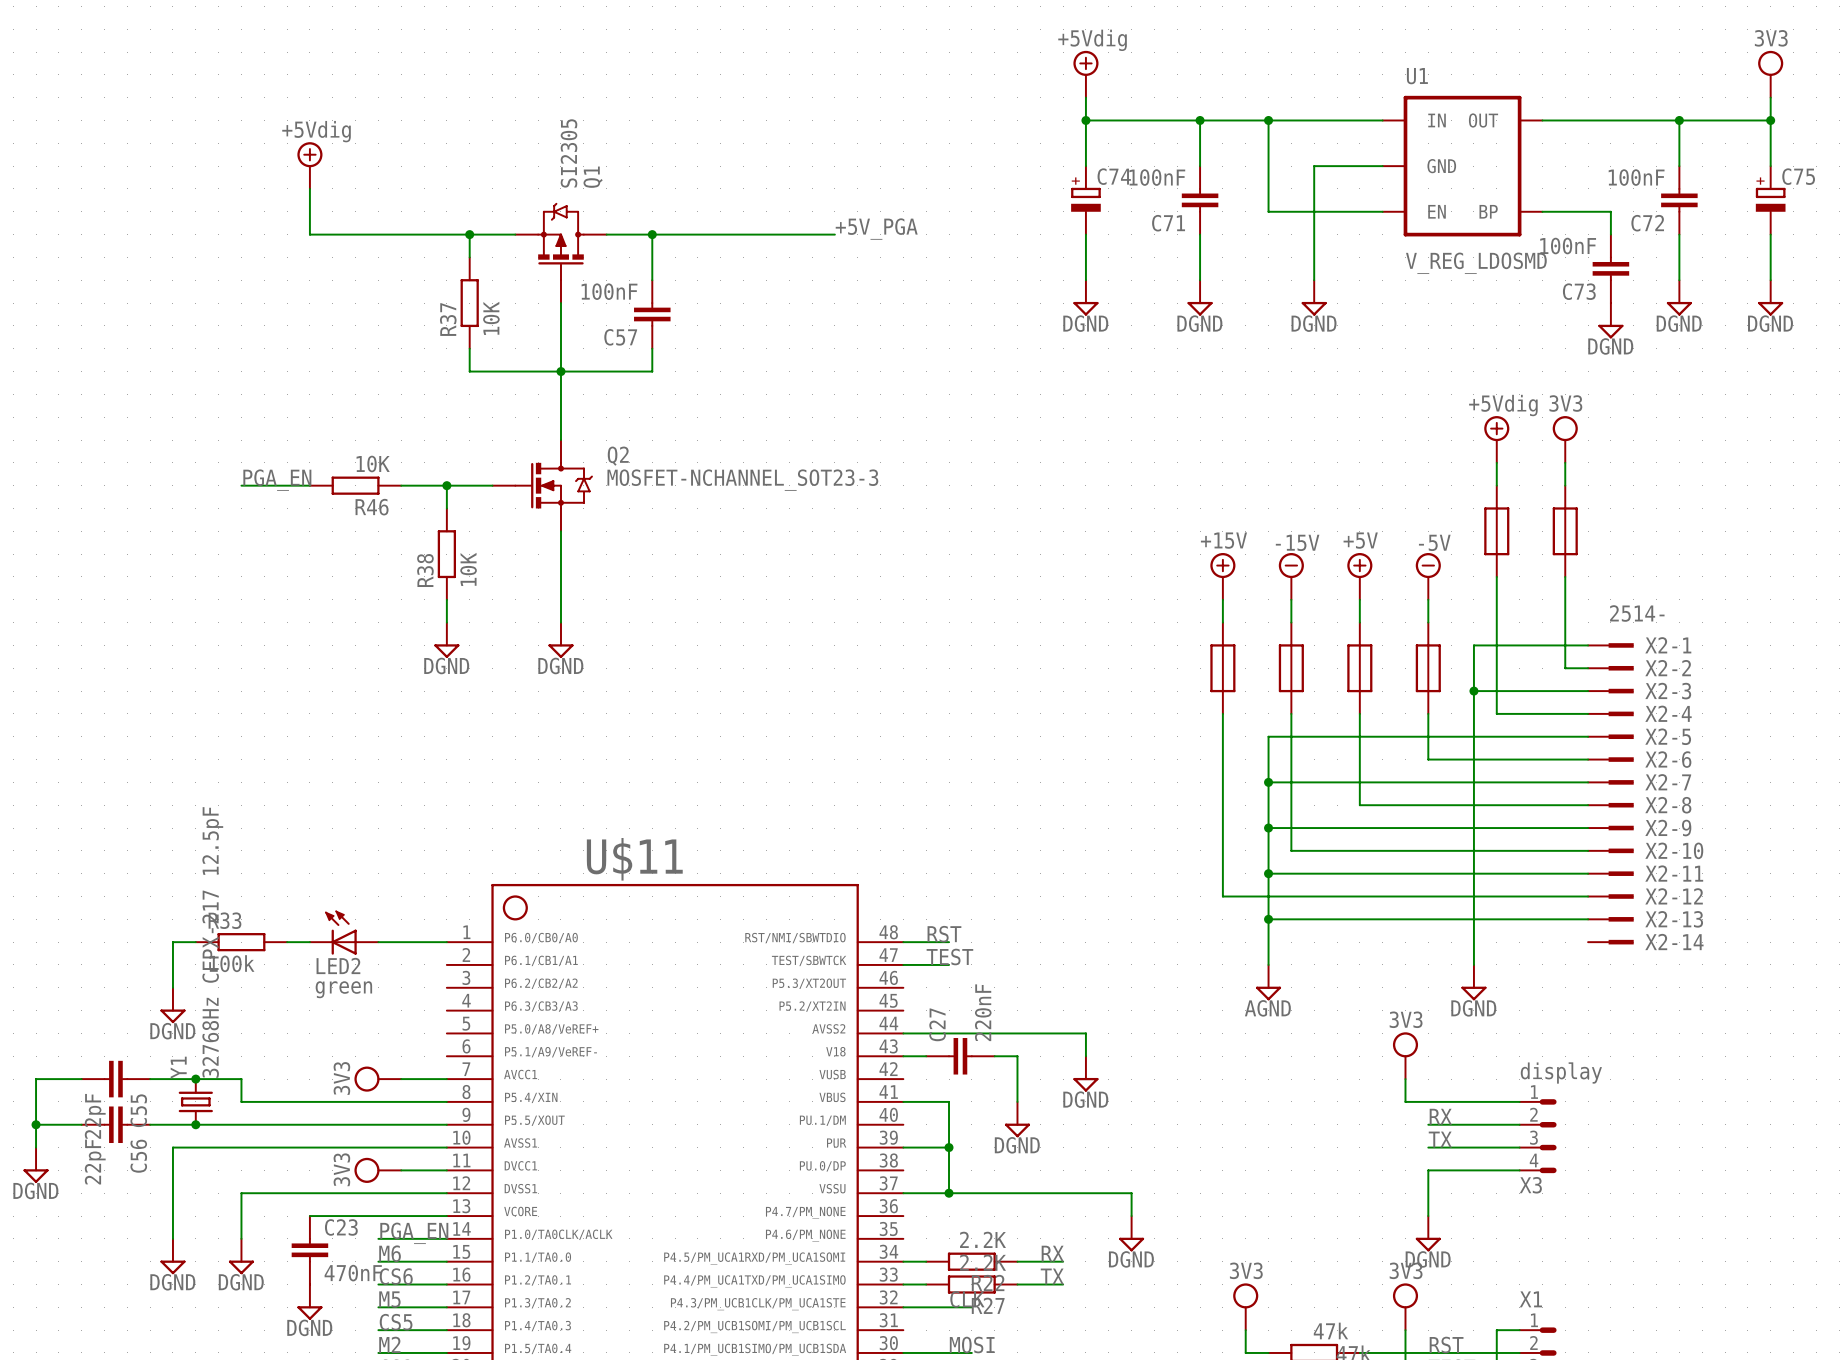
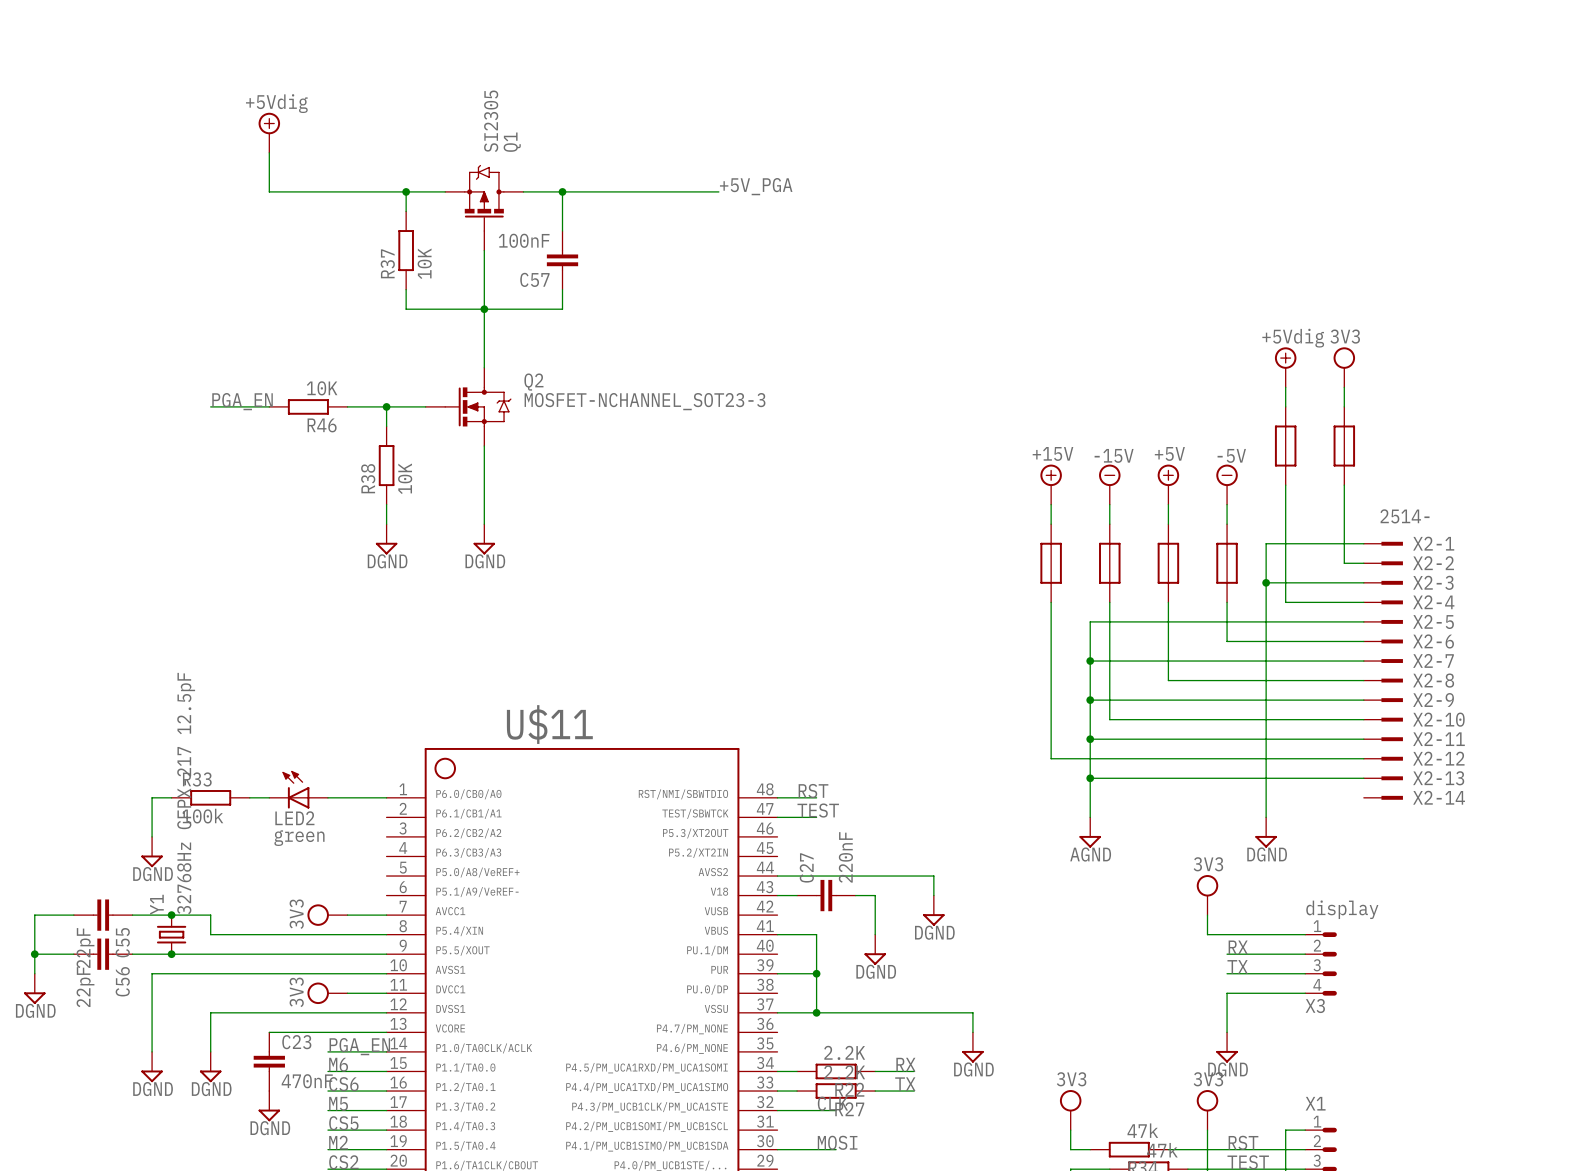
power symbol: +5Vdig (1085, 74) -> none
power symbol: 3V3 (1770, 74) -> none
wire: (1085, 97) (1085, 166) -> none
wire: (1770, 97) (1770, 166) -> none
wire: (1085, 120) (1382, 120) -> none
junction: (1085, 120) -> none
wire: (1200, 120) (1200, 166) -> none
junction: (1200, 120) -> none
wire: (1268, 120) (1268, 211) (1382, 211) -> none
junction: (1268, 120) -> none
wire: (1542, 120) (1770, 120) -> none
wire: (1679, 120) (1679, 166) -> none
junction: (1679, 120) -> none
junction: (1770, 120) -> none
wire: (1382, 166) (1314, 166) (1314, 280) -> none
U1: V_REG_LDOSMD (1462, 166) -> none
C74: (1085, 200) -> none
C71: 100nF (1200, 200) -> none
C72: 100nF (1679, 200) -> none
C75: (1770, 200) -> none
wire: (1542, 211) (1610, 211) (1610, 234) -> none
wire: (1085, 234) (1085, 280) -> none
wire: (1200, 234) (1200, 280) -> none
wire: (1679, 234) (1679, 280) -> none
wire: (1770, 234) (1770, 280) -> none
C73: 100nF (1610, 268) -> none
power symbol: DGND (1085, 297) -> none
power symbol: DGND (1200, 297) -> none
power symbol: DGND (1314, 297) -> none
power symbol: DGND (1679, 297) -> none
power symbol: DGND (1770, 297) -> none
power symbol: DGND (1610, 320) -> none

